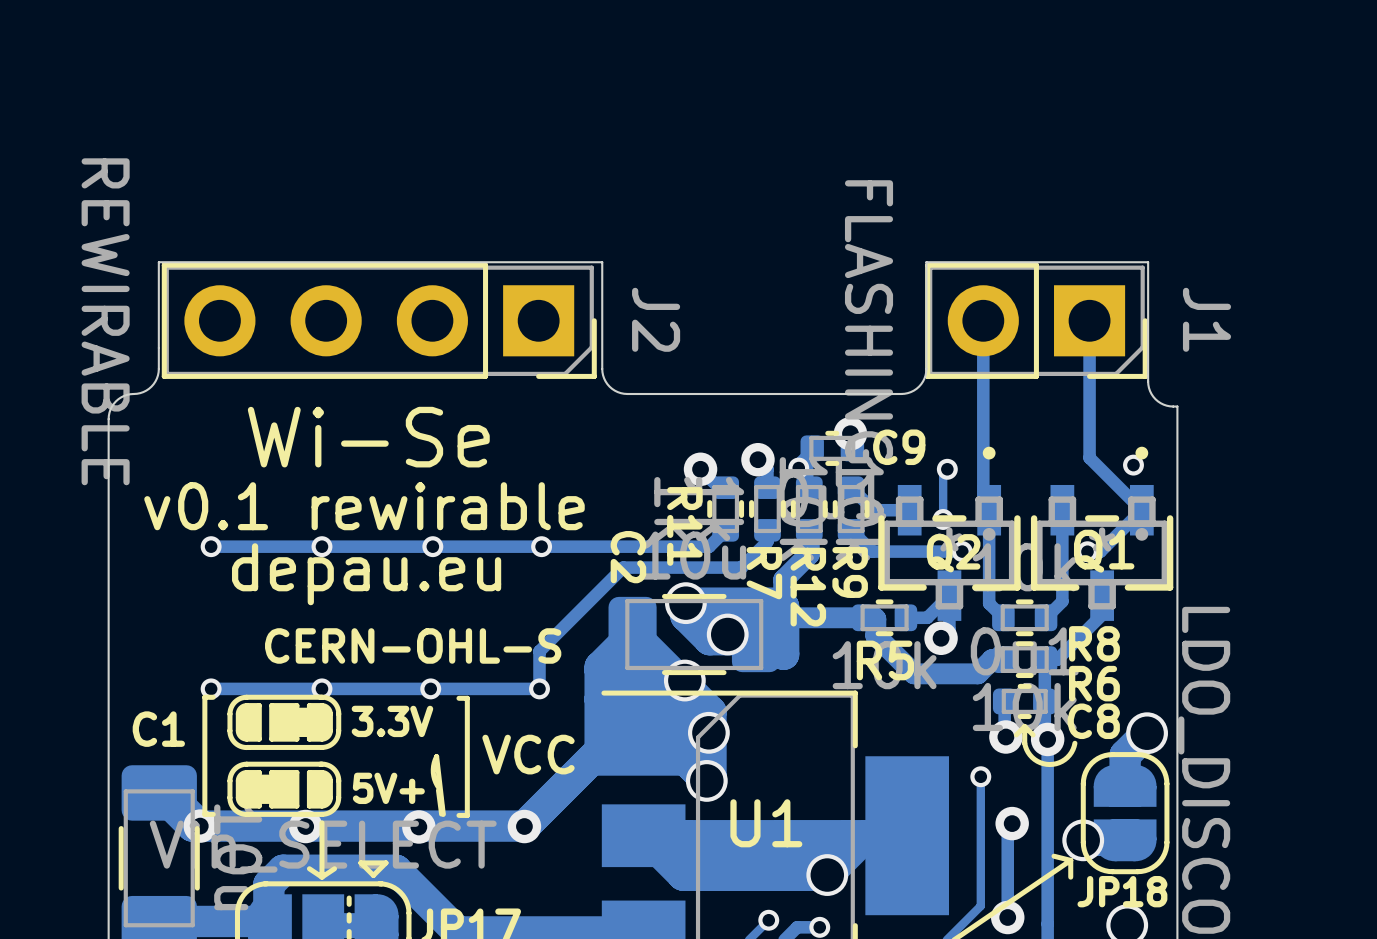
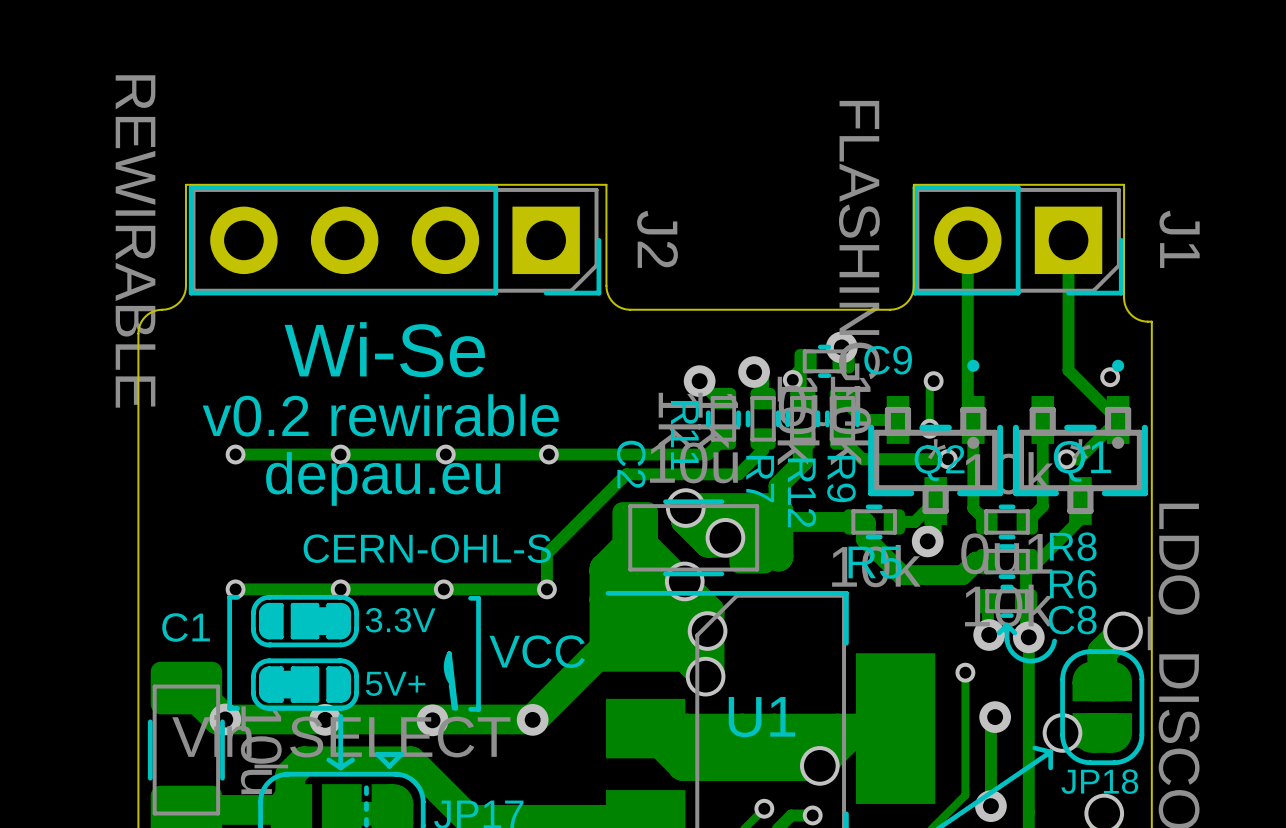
text: v0.1 rewirable (364, 506) -> v0.2 rewirable (380, 415)

